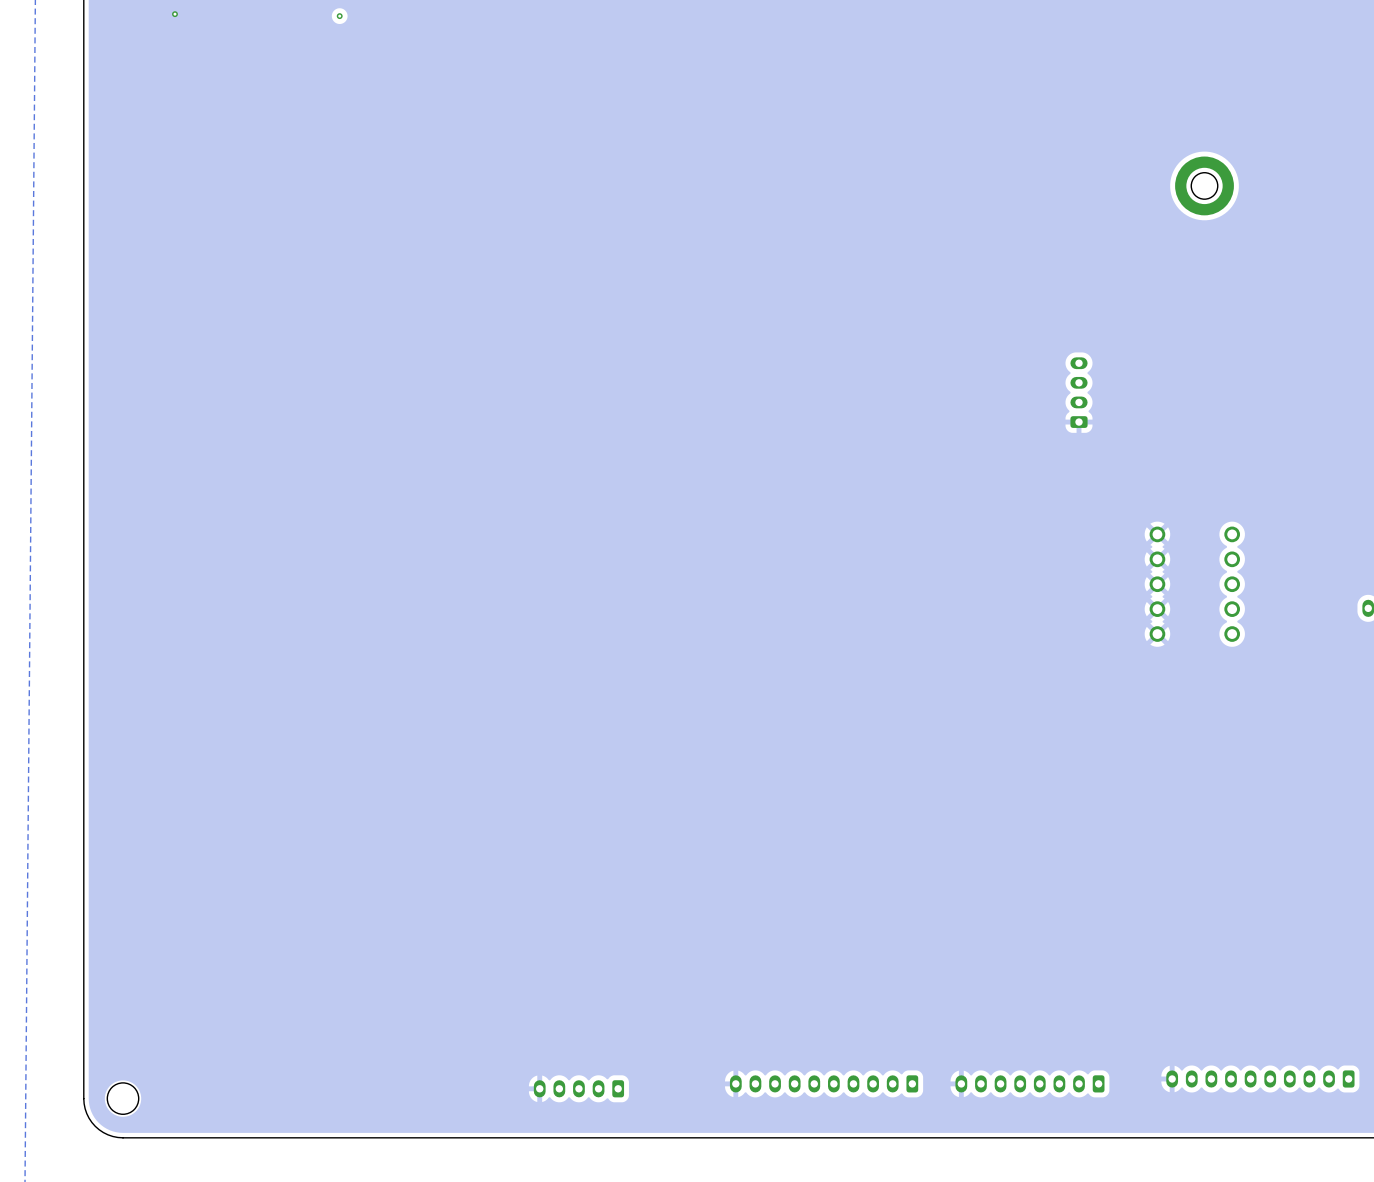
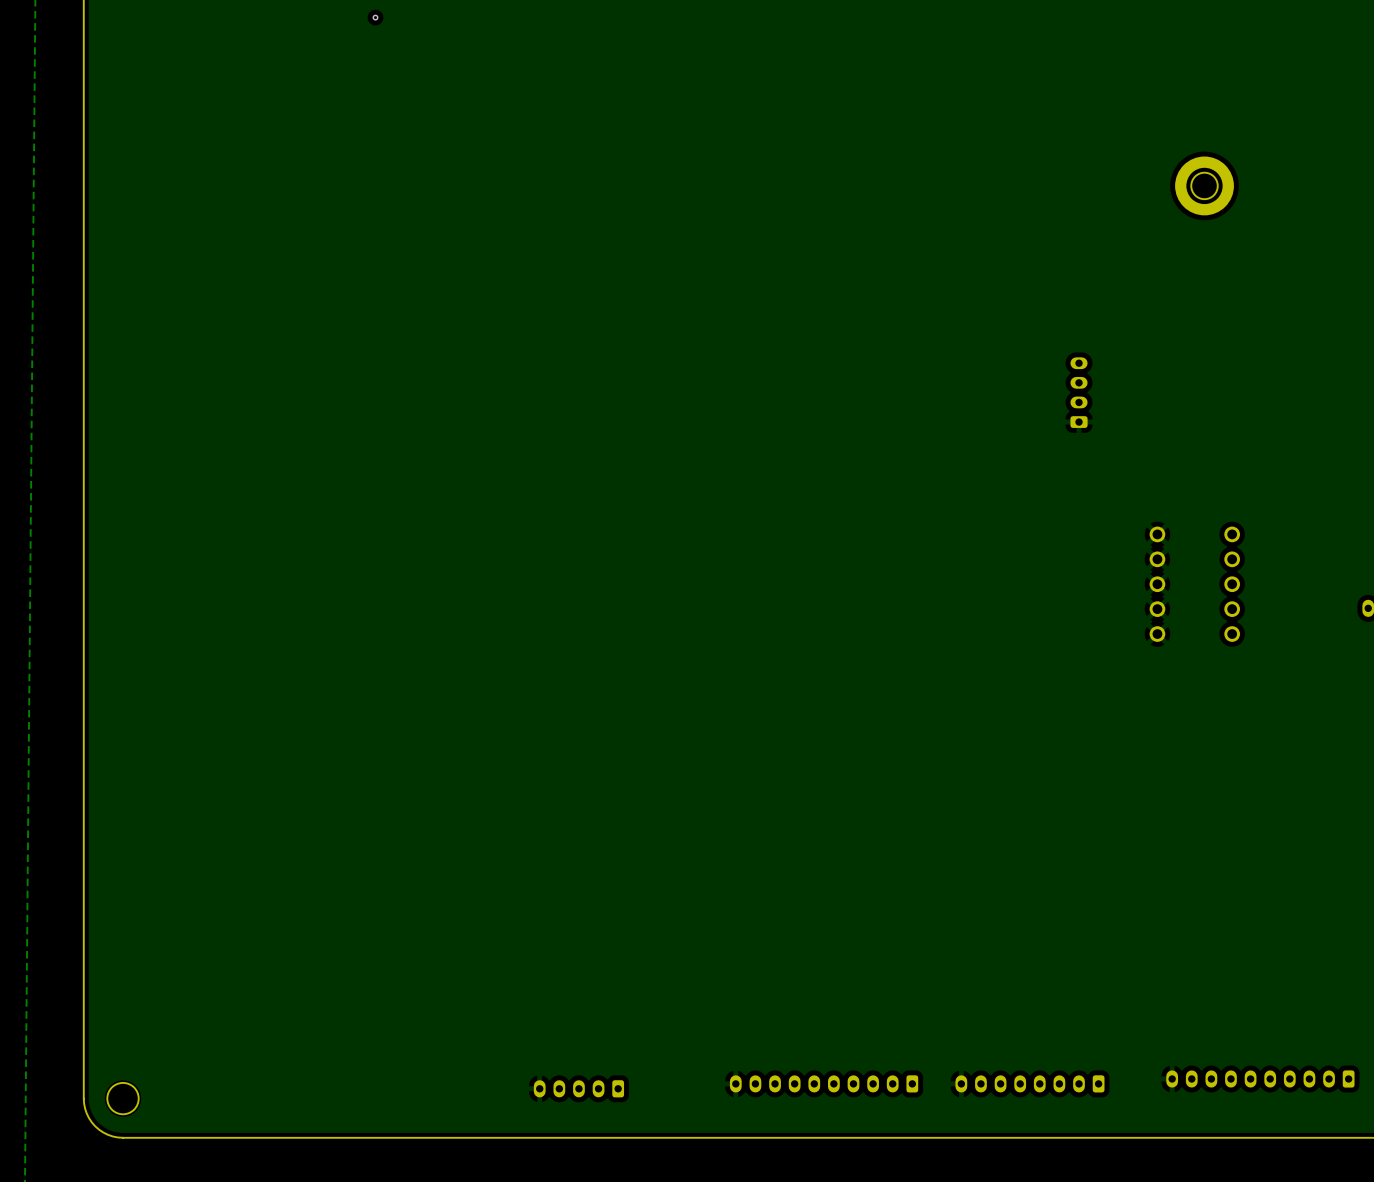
via: (174, 14) -> none
via position: (339, 16) -> (375, 17)

